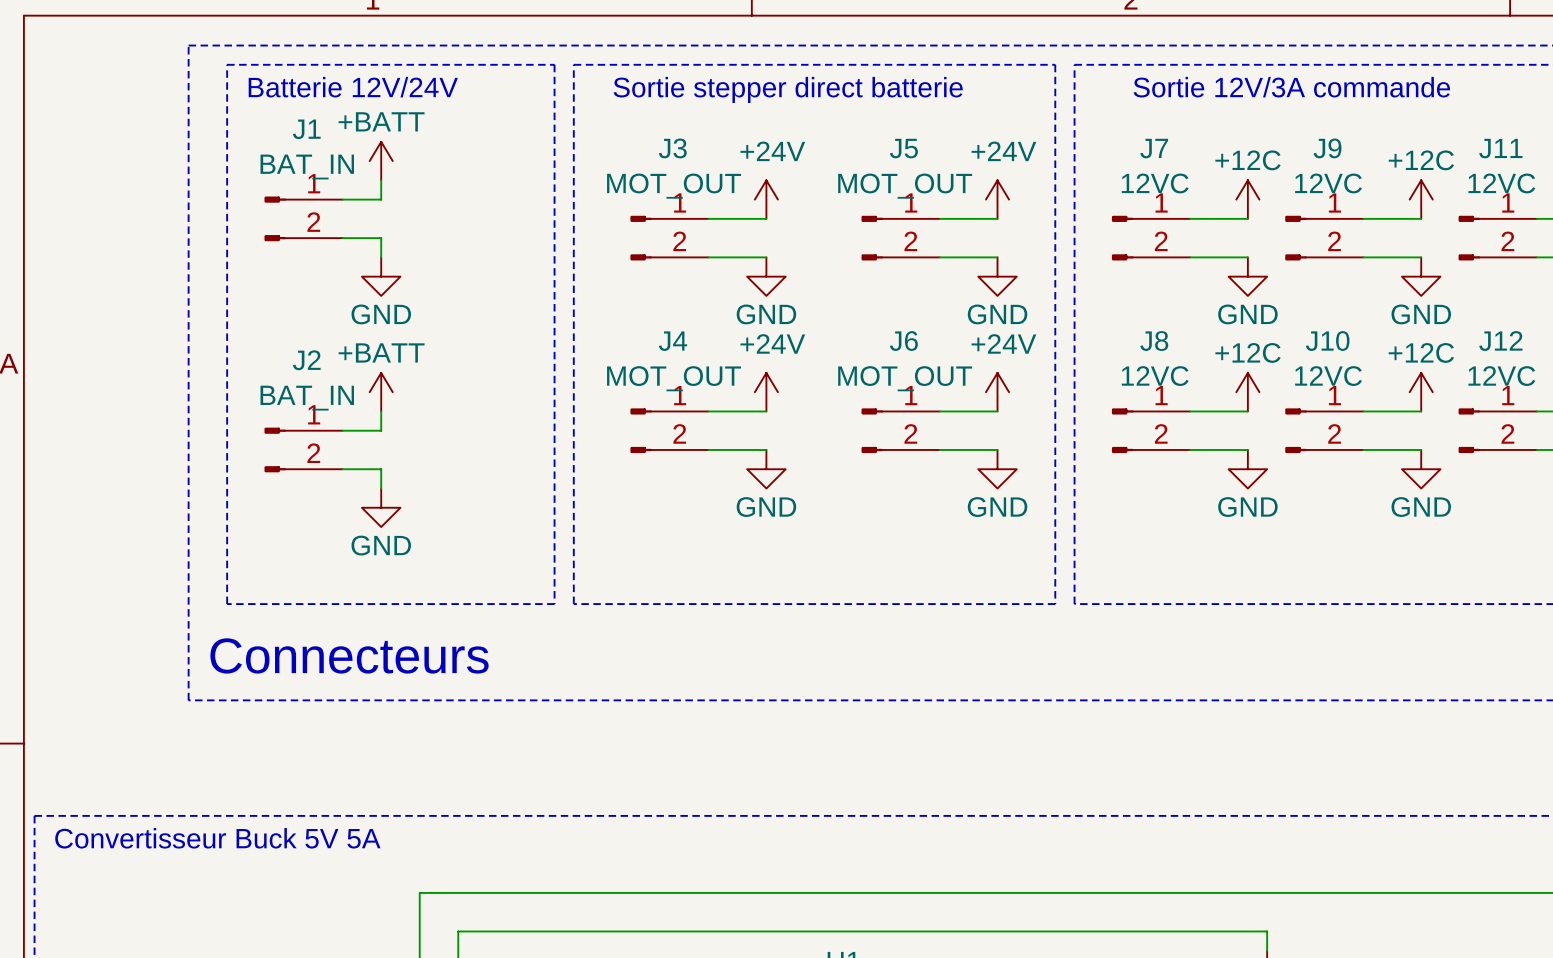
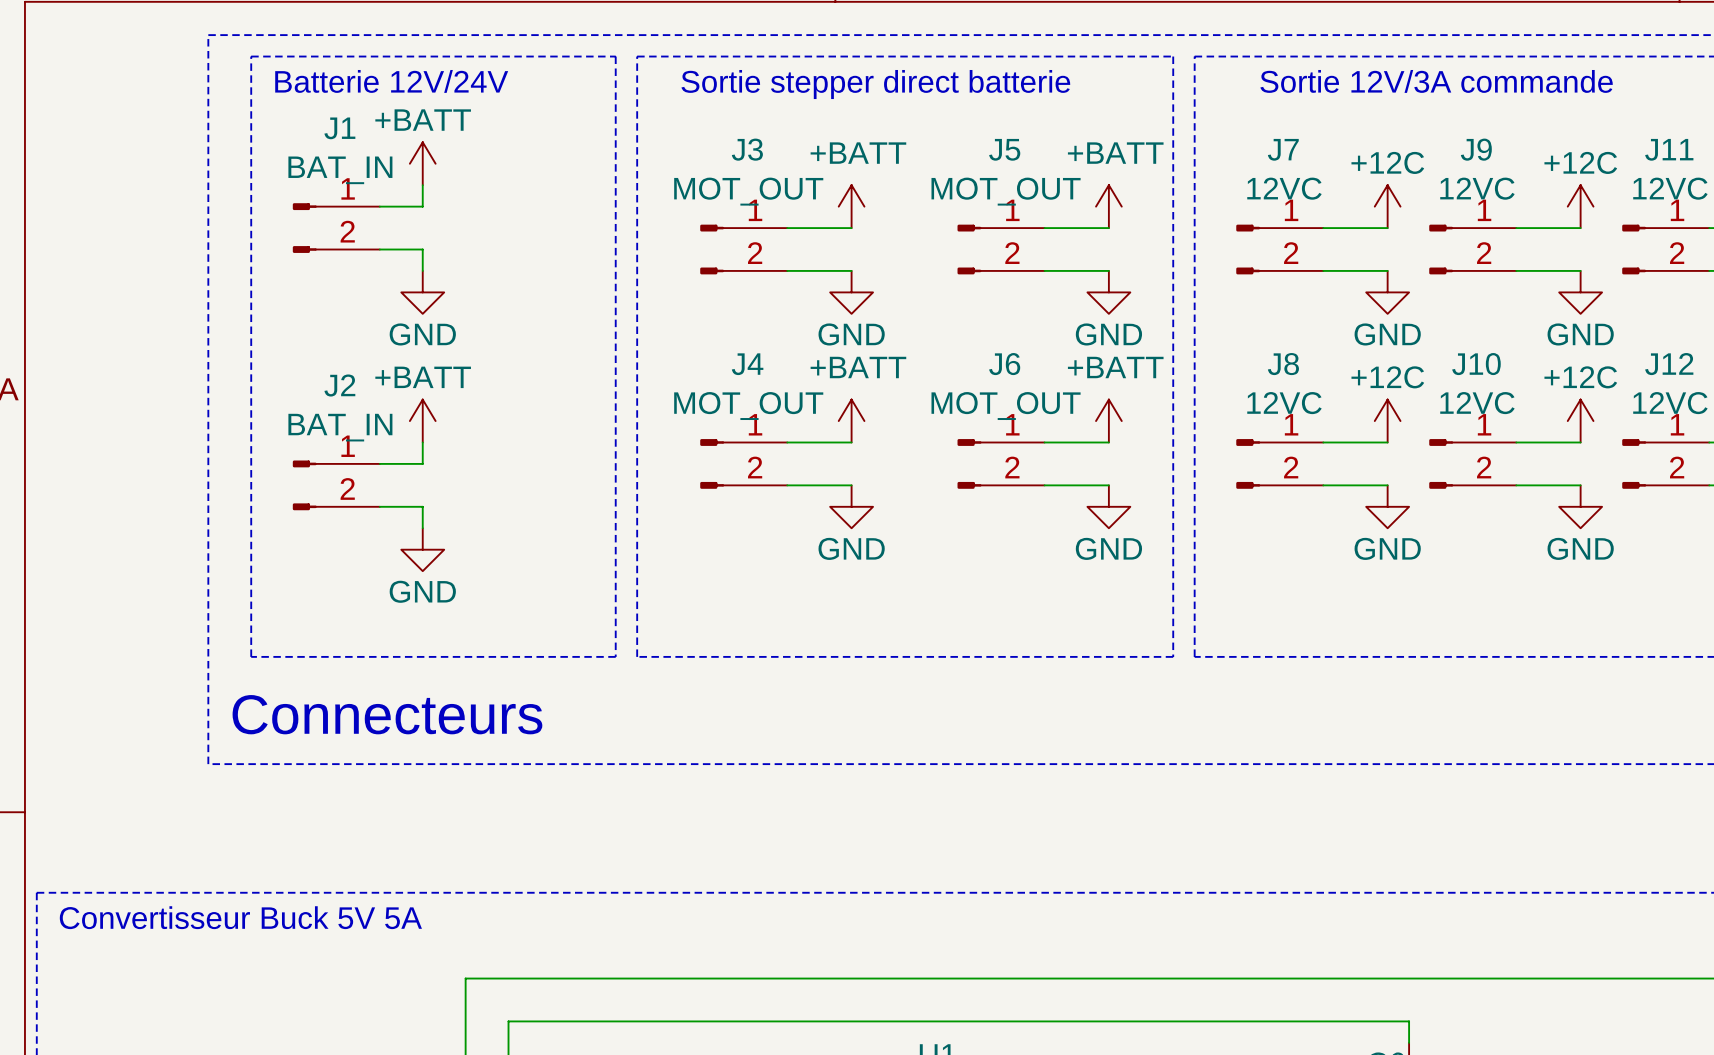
power symbol: +24V (766, 199) -> +BATT (851, 206)
power symbol: +24V (997, 199) -> +BATT (1108, 206)
power symbol: +24V (766, 392) -> +BATT (851, 421)
power symbol: +24V (997, 392) -> +BATT (1108, 421)

